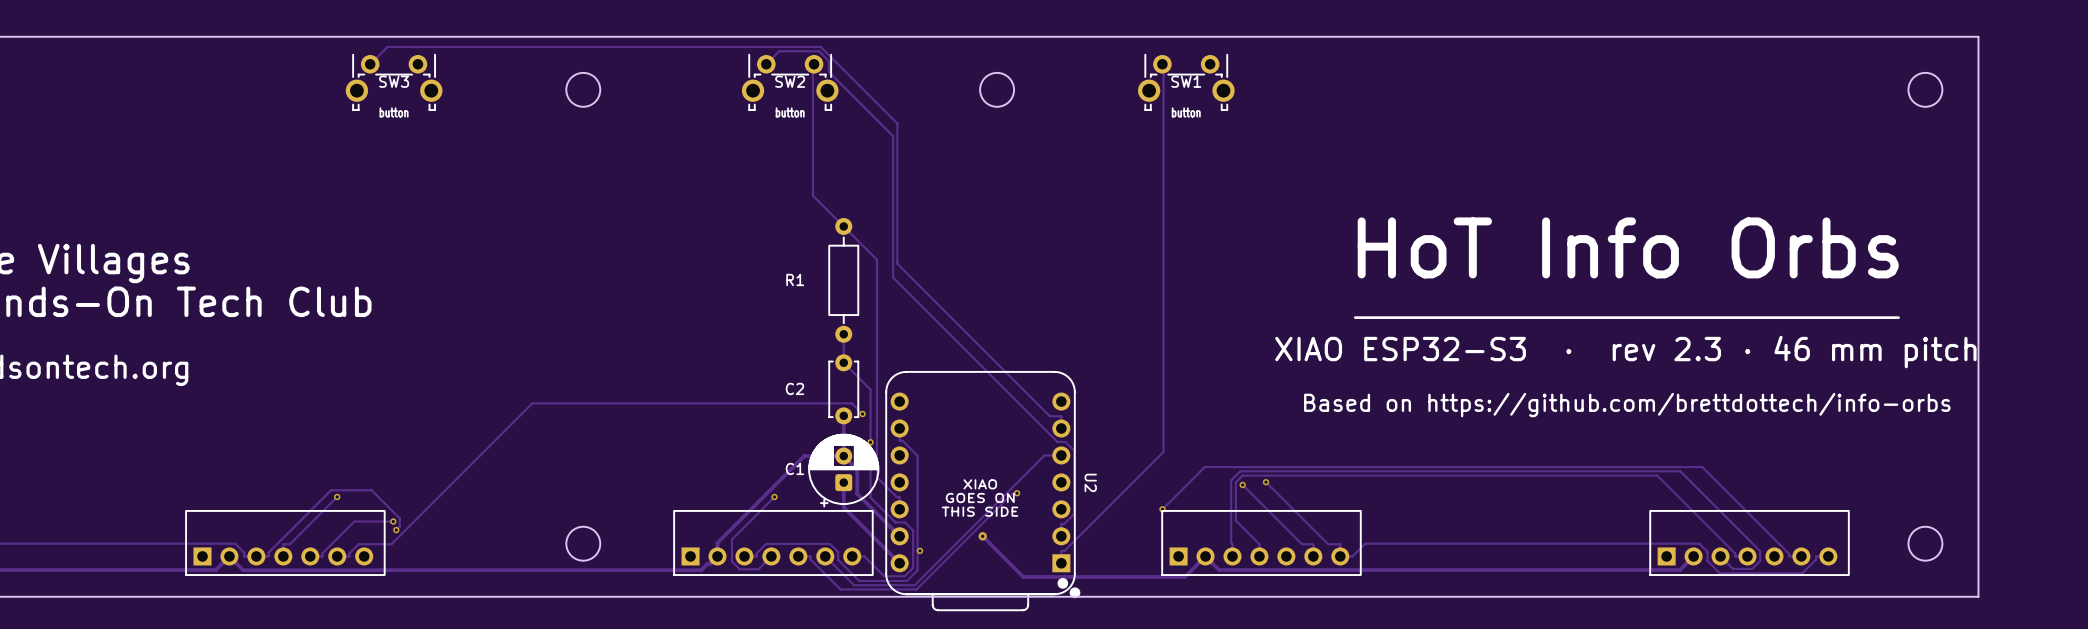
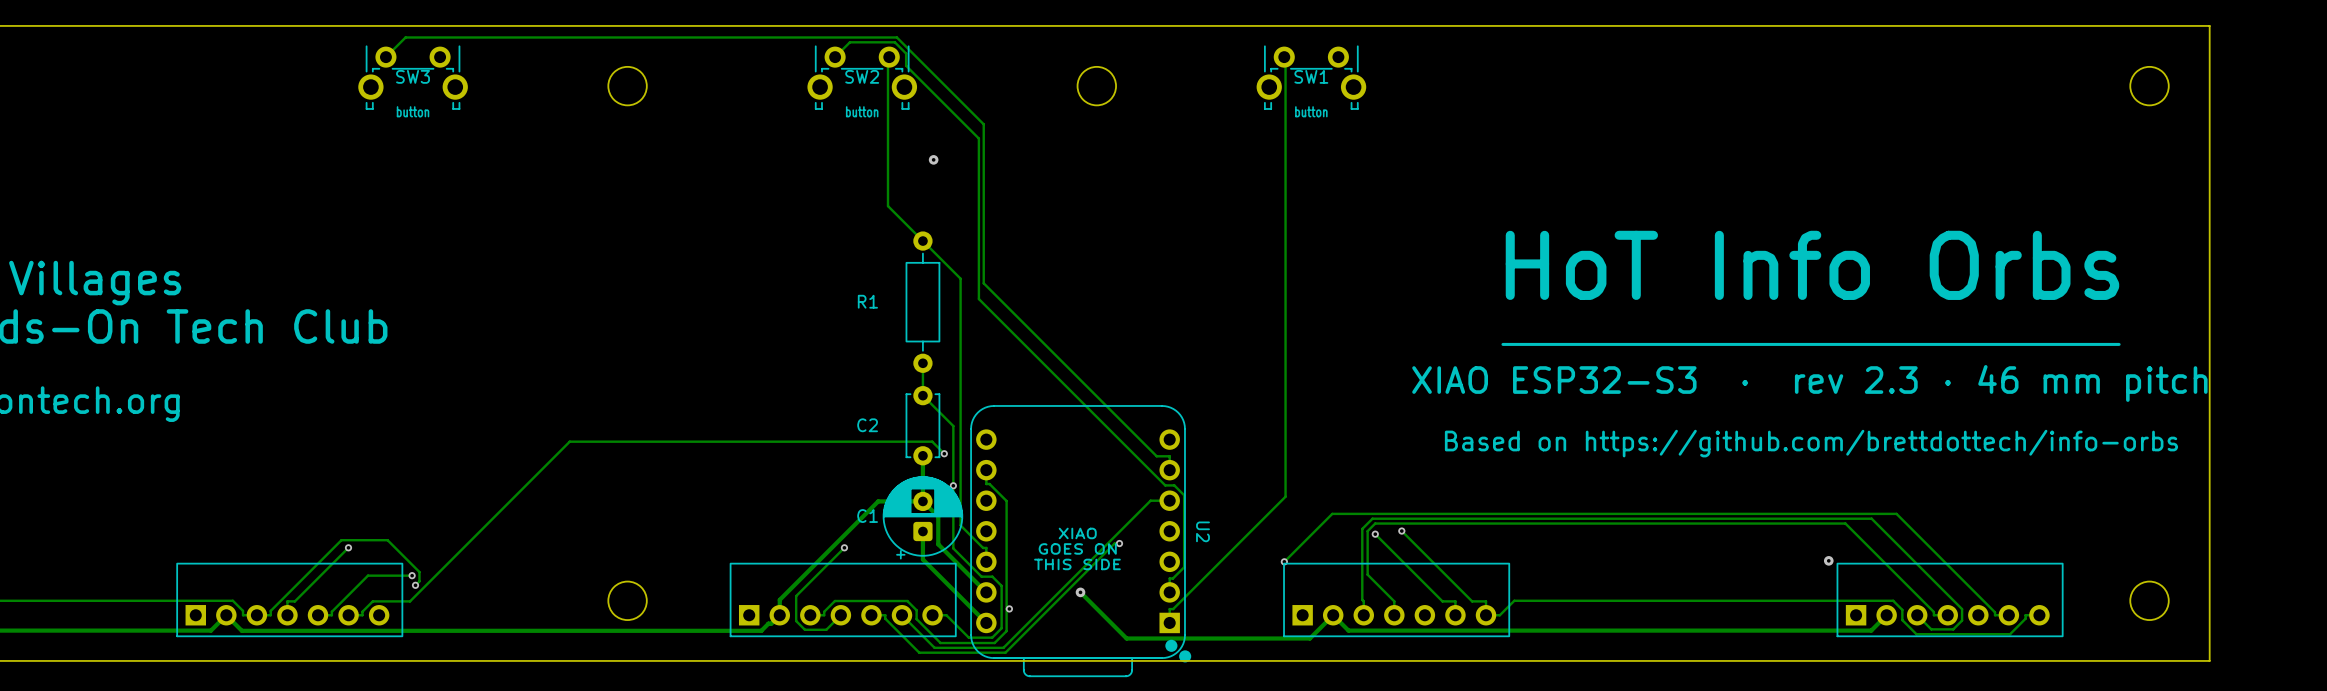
via: none -> (933, 159)
via: none -> (1828, 560)

